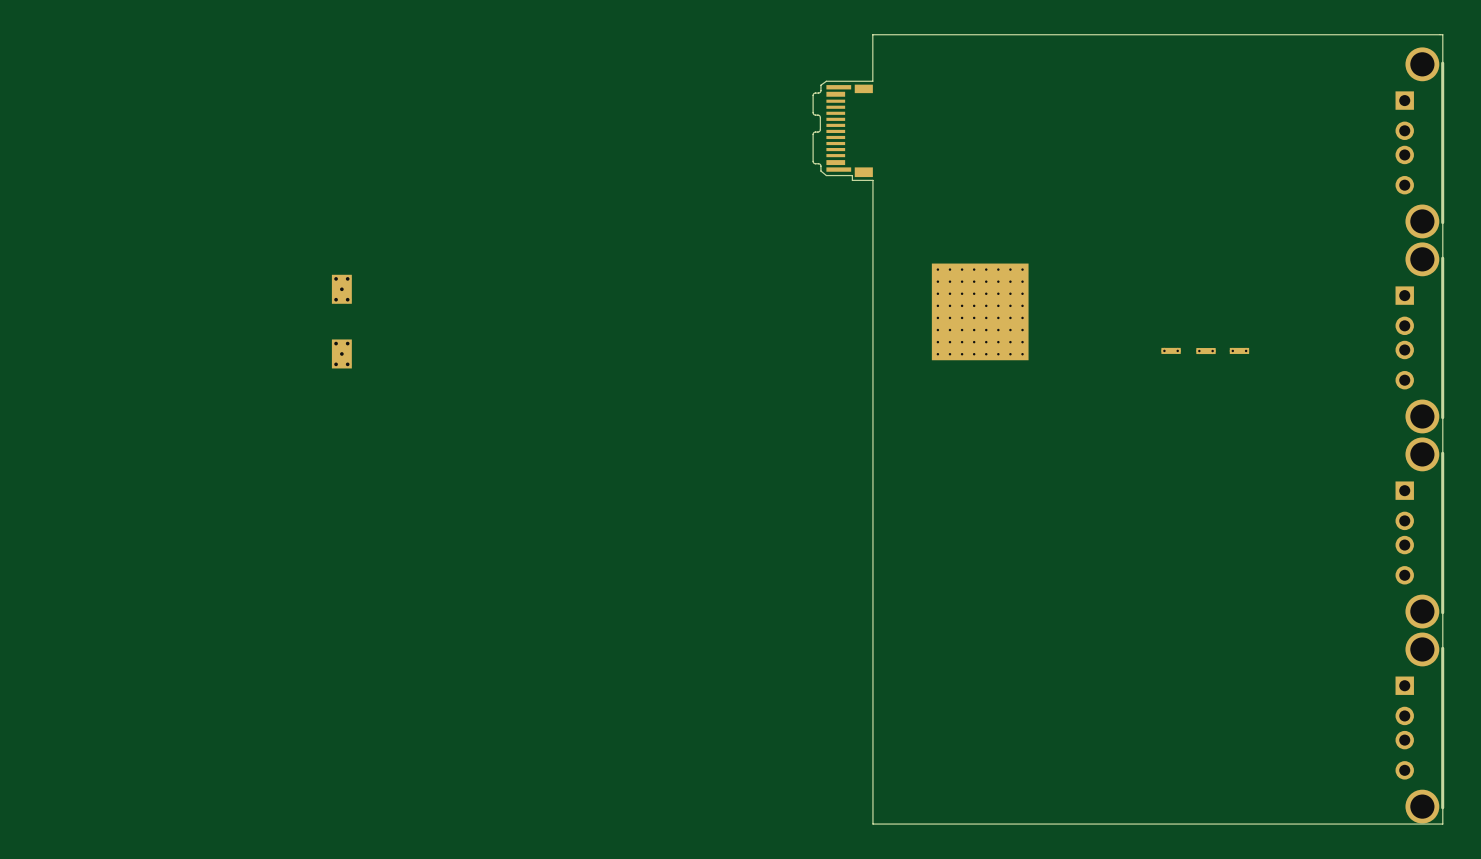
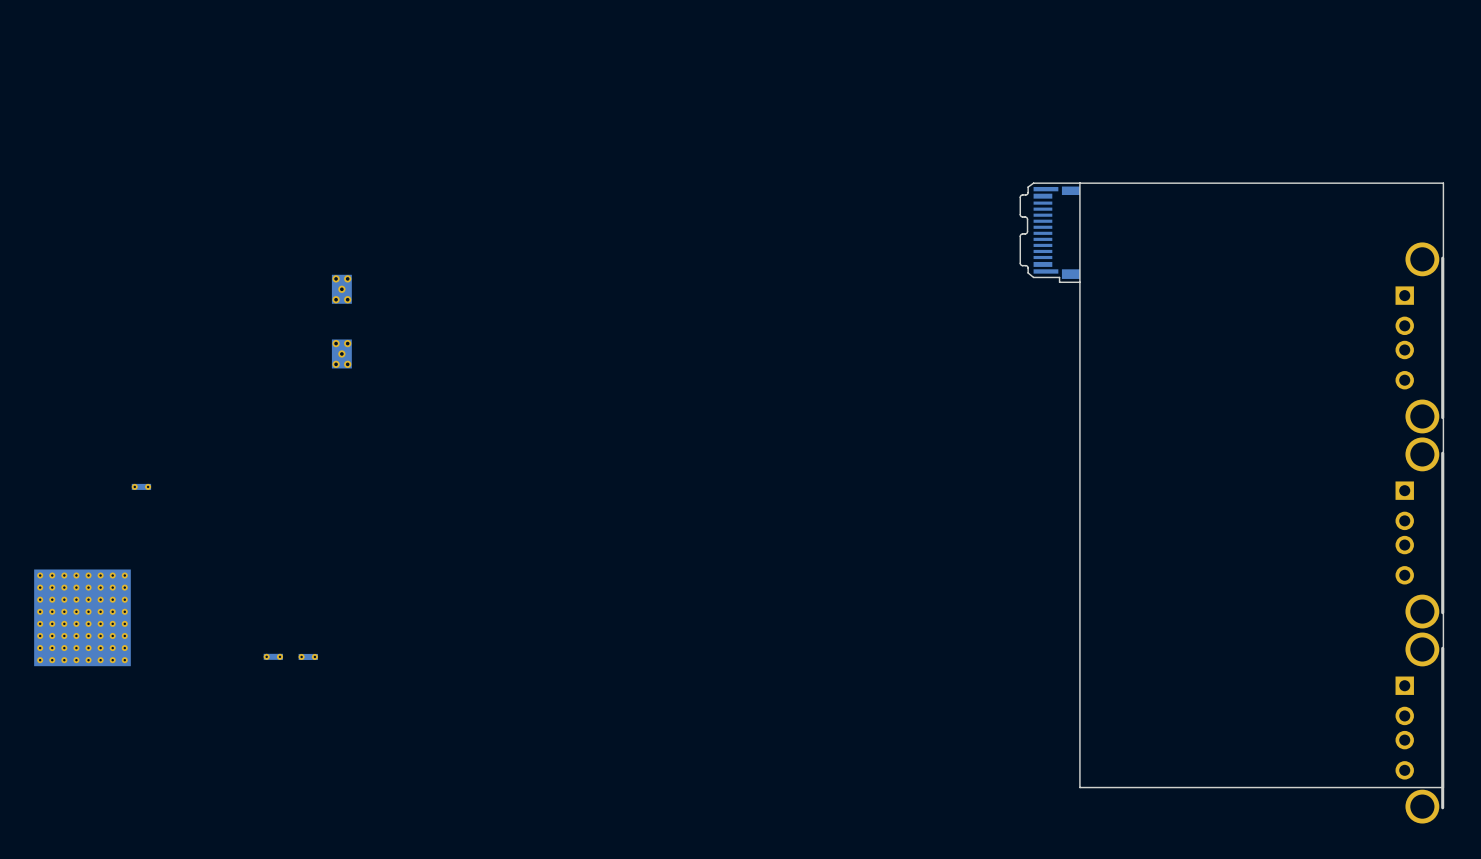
board edge: (1439, 34) (872, 34) (872, 81) -> none
board edge: (1440, 34) (1442, 34) (1442, 824) (872, 824) (872, 180) -> none
part position: (843, 130) -> (1050, 232)
part: (1419, 142) -> none
board edge: none -> (1443, 183) (1443, 787) (1079, 787) (1079, 183) (1443, 183)
part: (980, 311) -> none
part: (1171, 350) -> none
part: (1239, 350) -> none
part: (1206, 351) -> none
part: none -> (141, 486)
part: none -> (82, 617)
part: none -> (273, 656)
part: none -> (308, 656)

